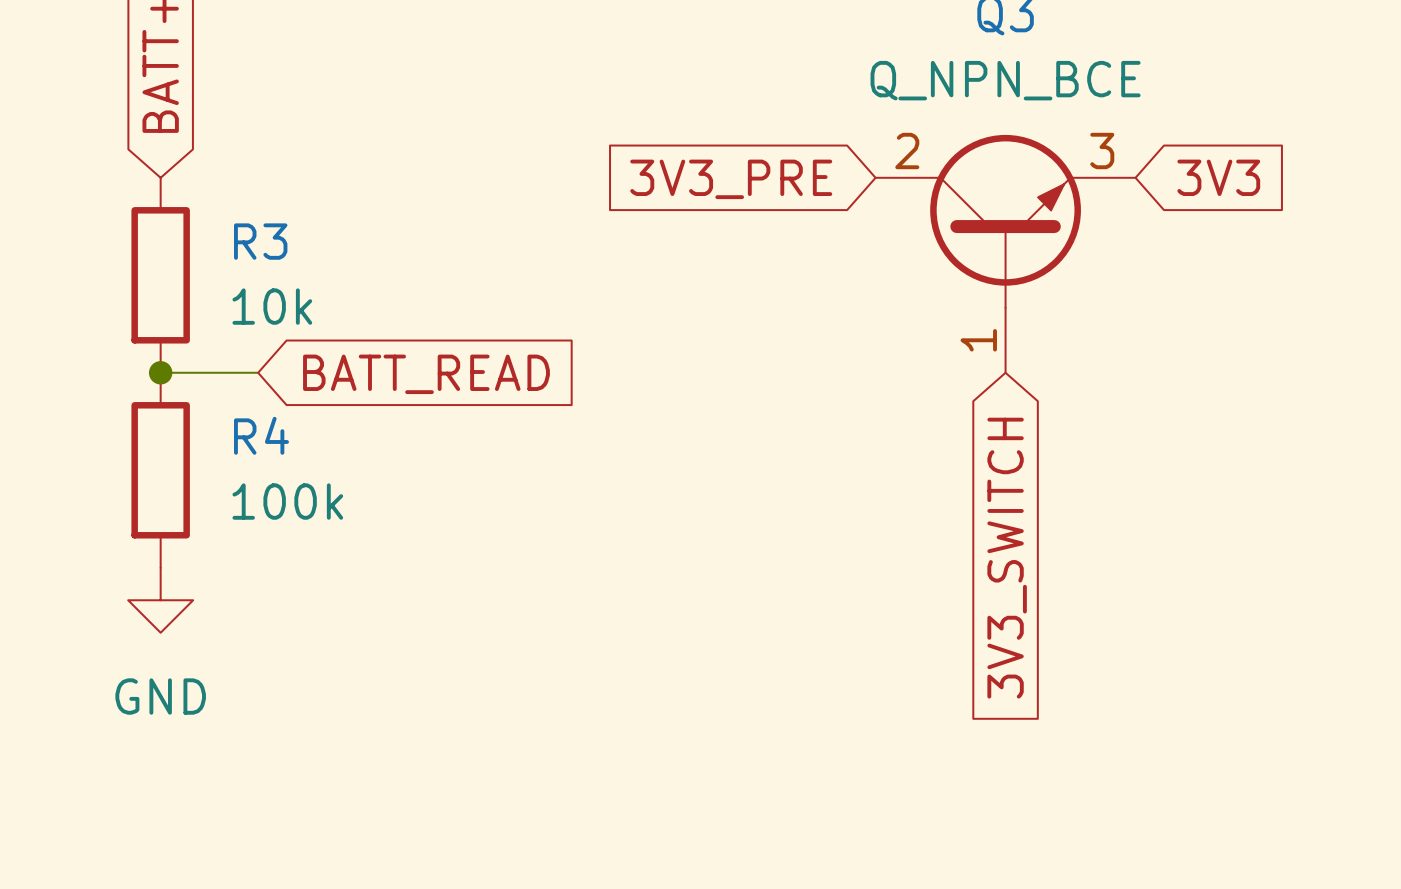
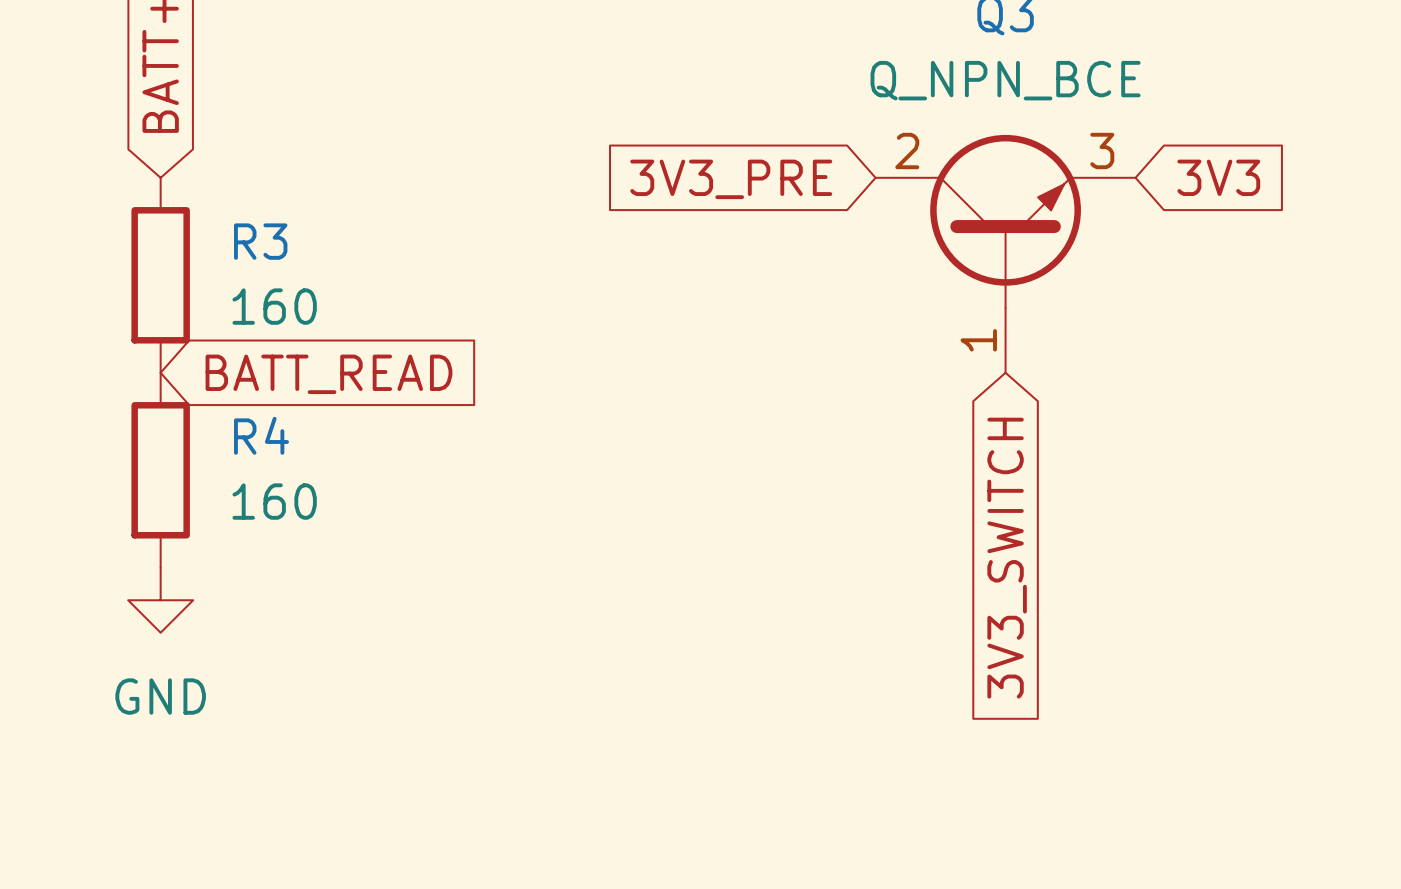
R3 value: 10k (272, 306) -> 160 (274, 306)
wire: (160, 372) (258, 372) -> none
junction: (160, 372) -> none
global label position: BATT_READ (426, 374) -> BATT_READ (328, 374)
R4 value: 100k (287, 501) -> 160 (274, 501)

